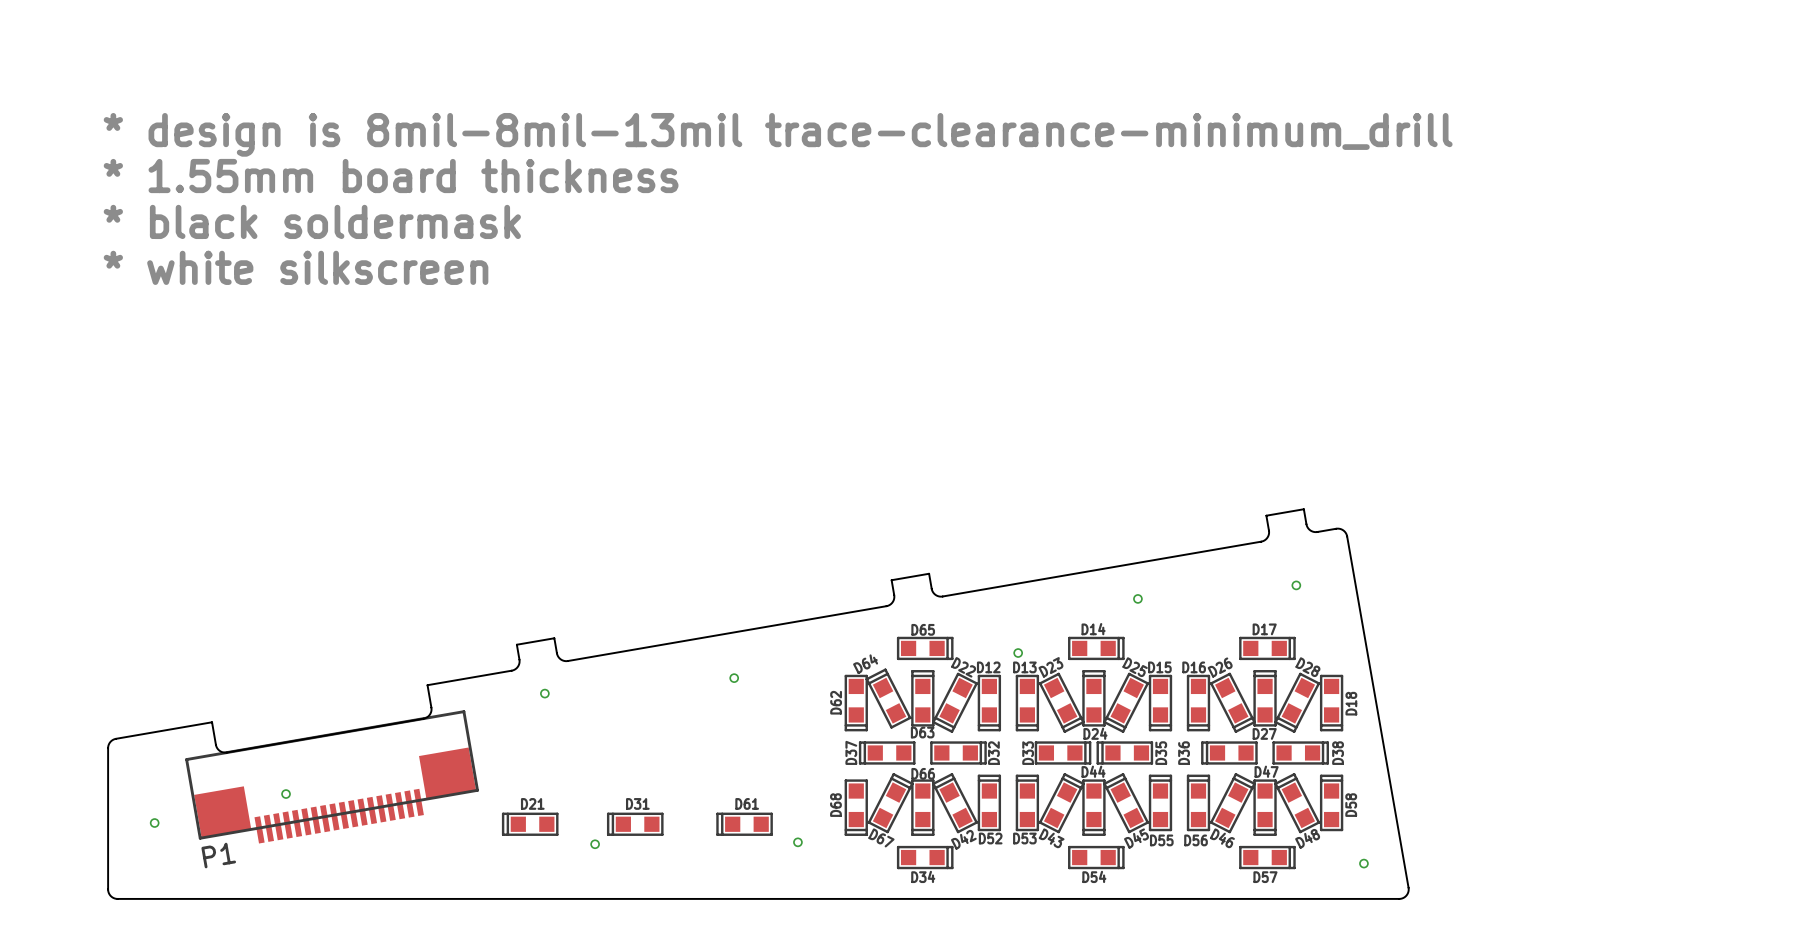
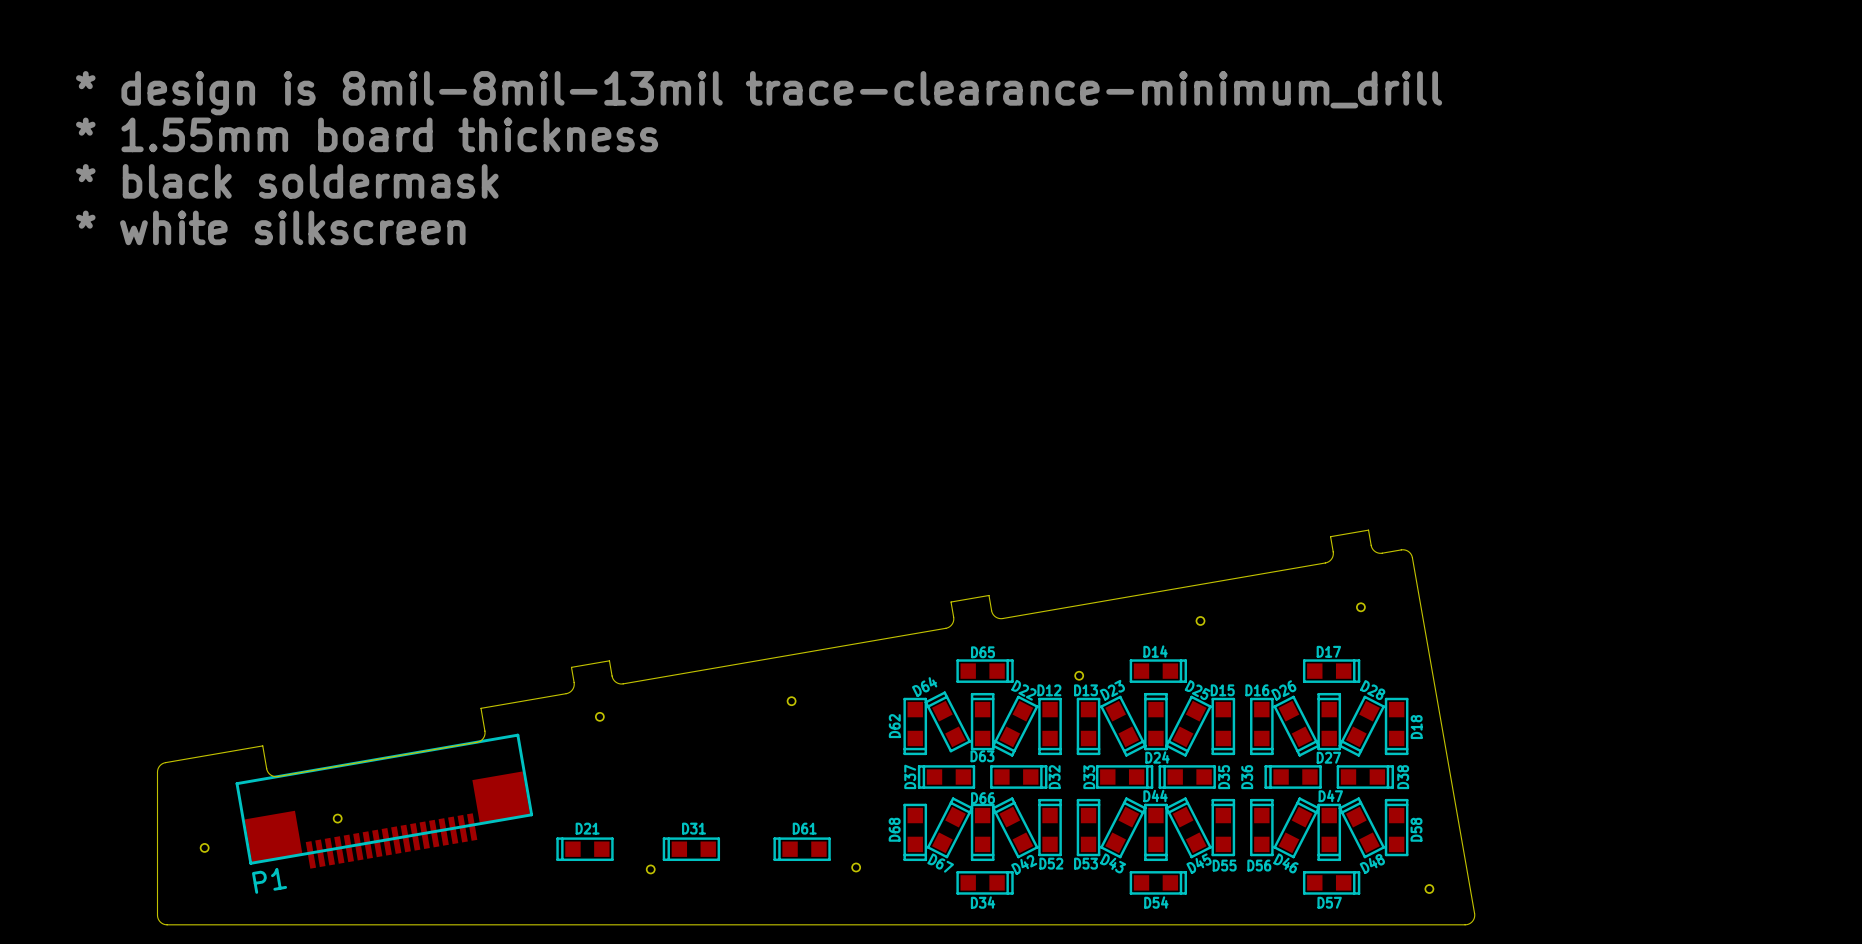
text position: * design is 8mil-8mil-13mil trace-clearance-minimum_drill (778, 134) -> * design is 8mil-8mil-13mil trace-clearance-minimum_drill (759, 93)
text position: * 1.55mm board thickness (391, 176) -> * 1.55mm board thickness (367, 134)
text position: * black soldermask (312, 221) -> * black soldermask (287, 181)
text position: * white silkscreen (296, 267) -> * white silkscreen (270, 227)

